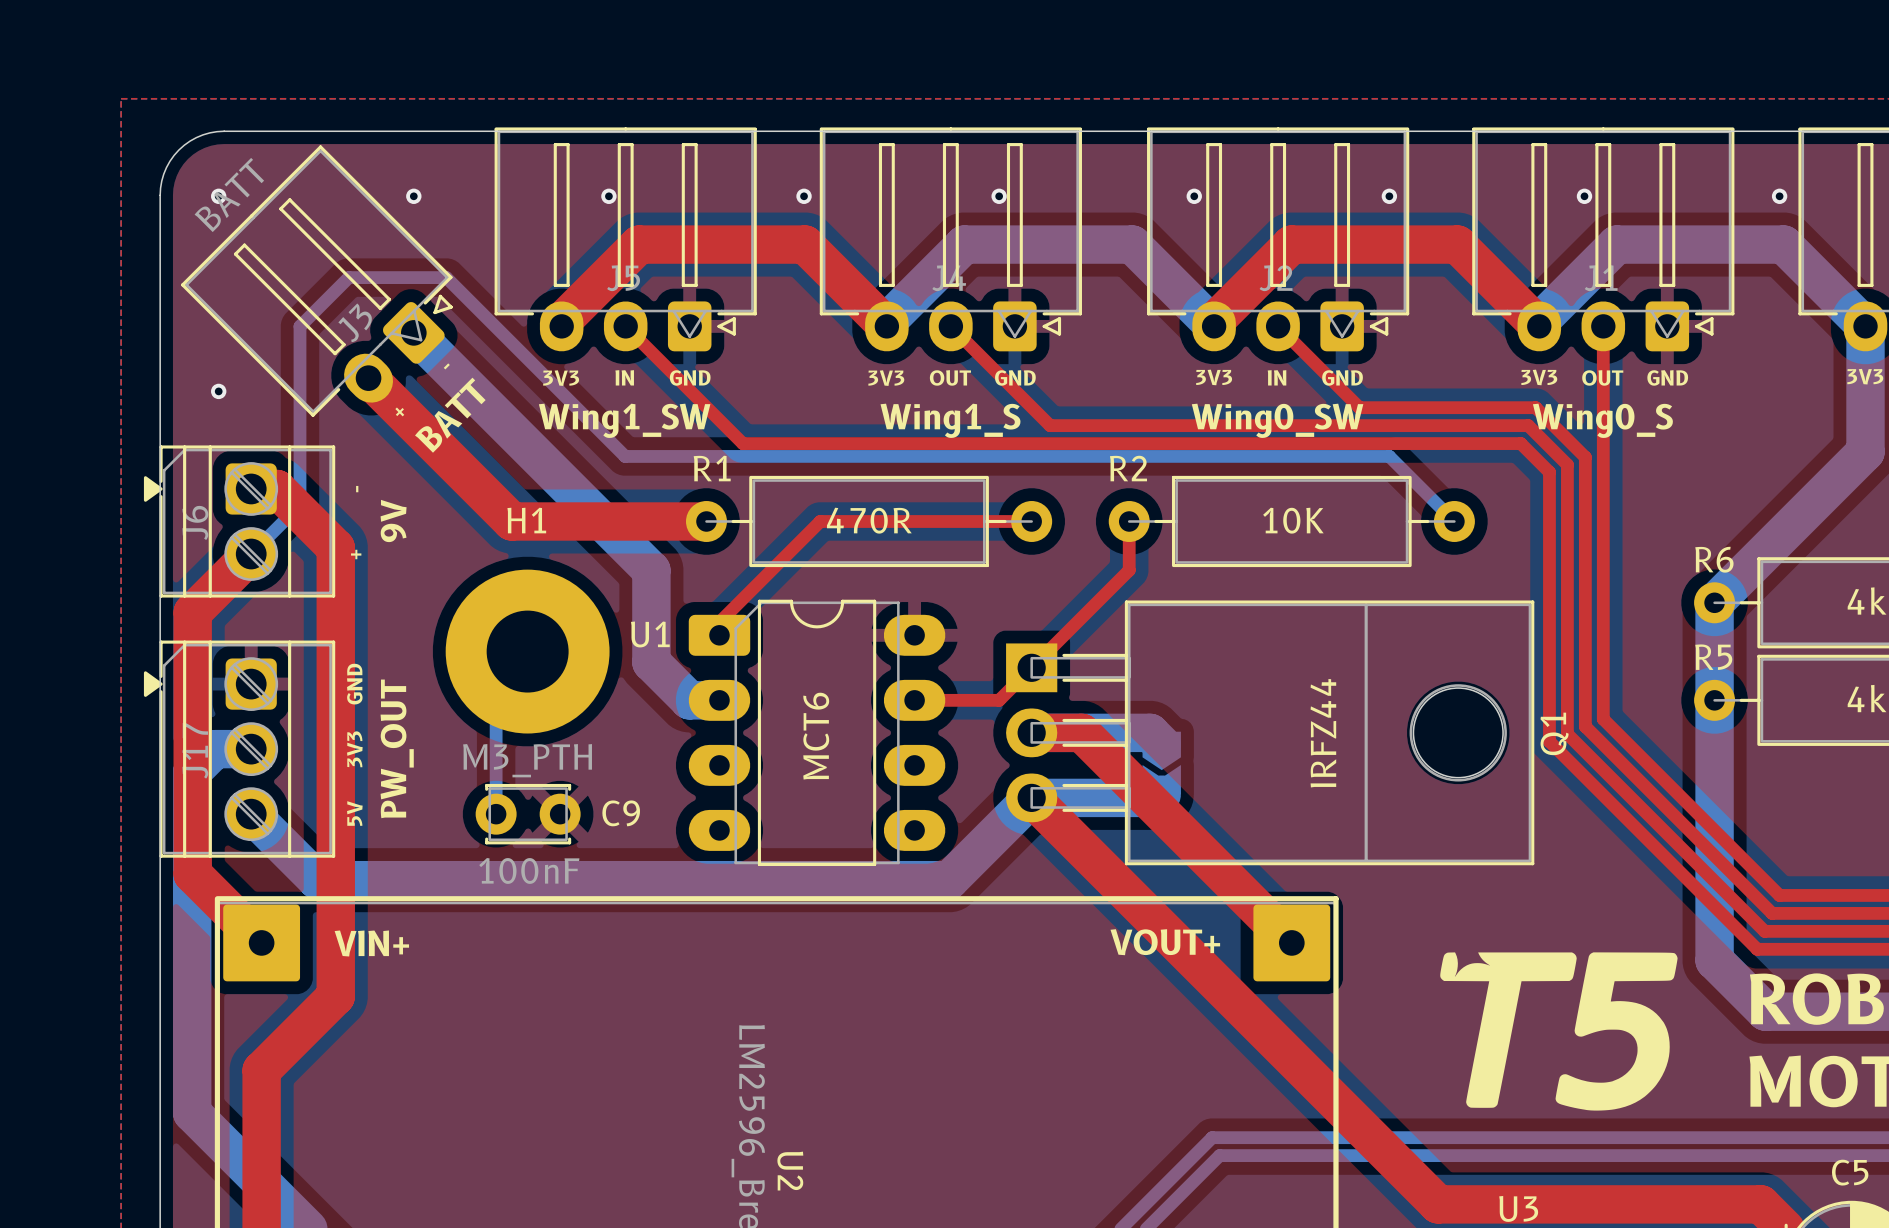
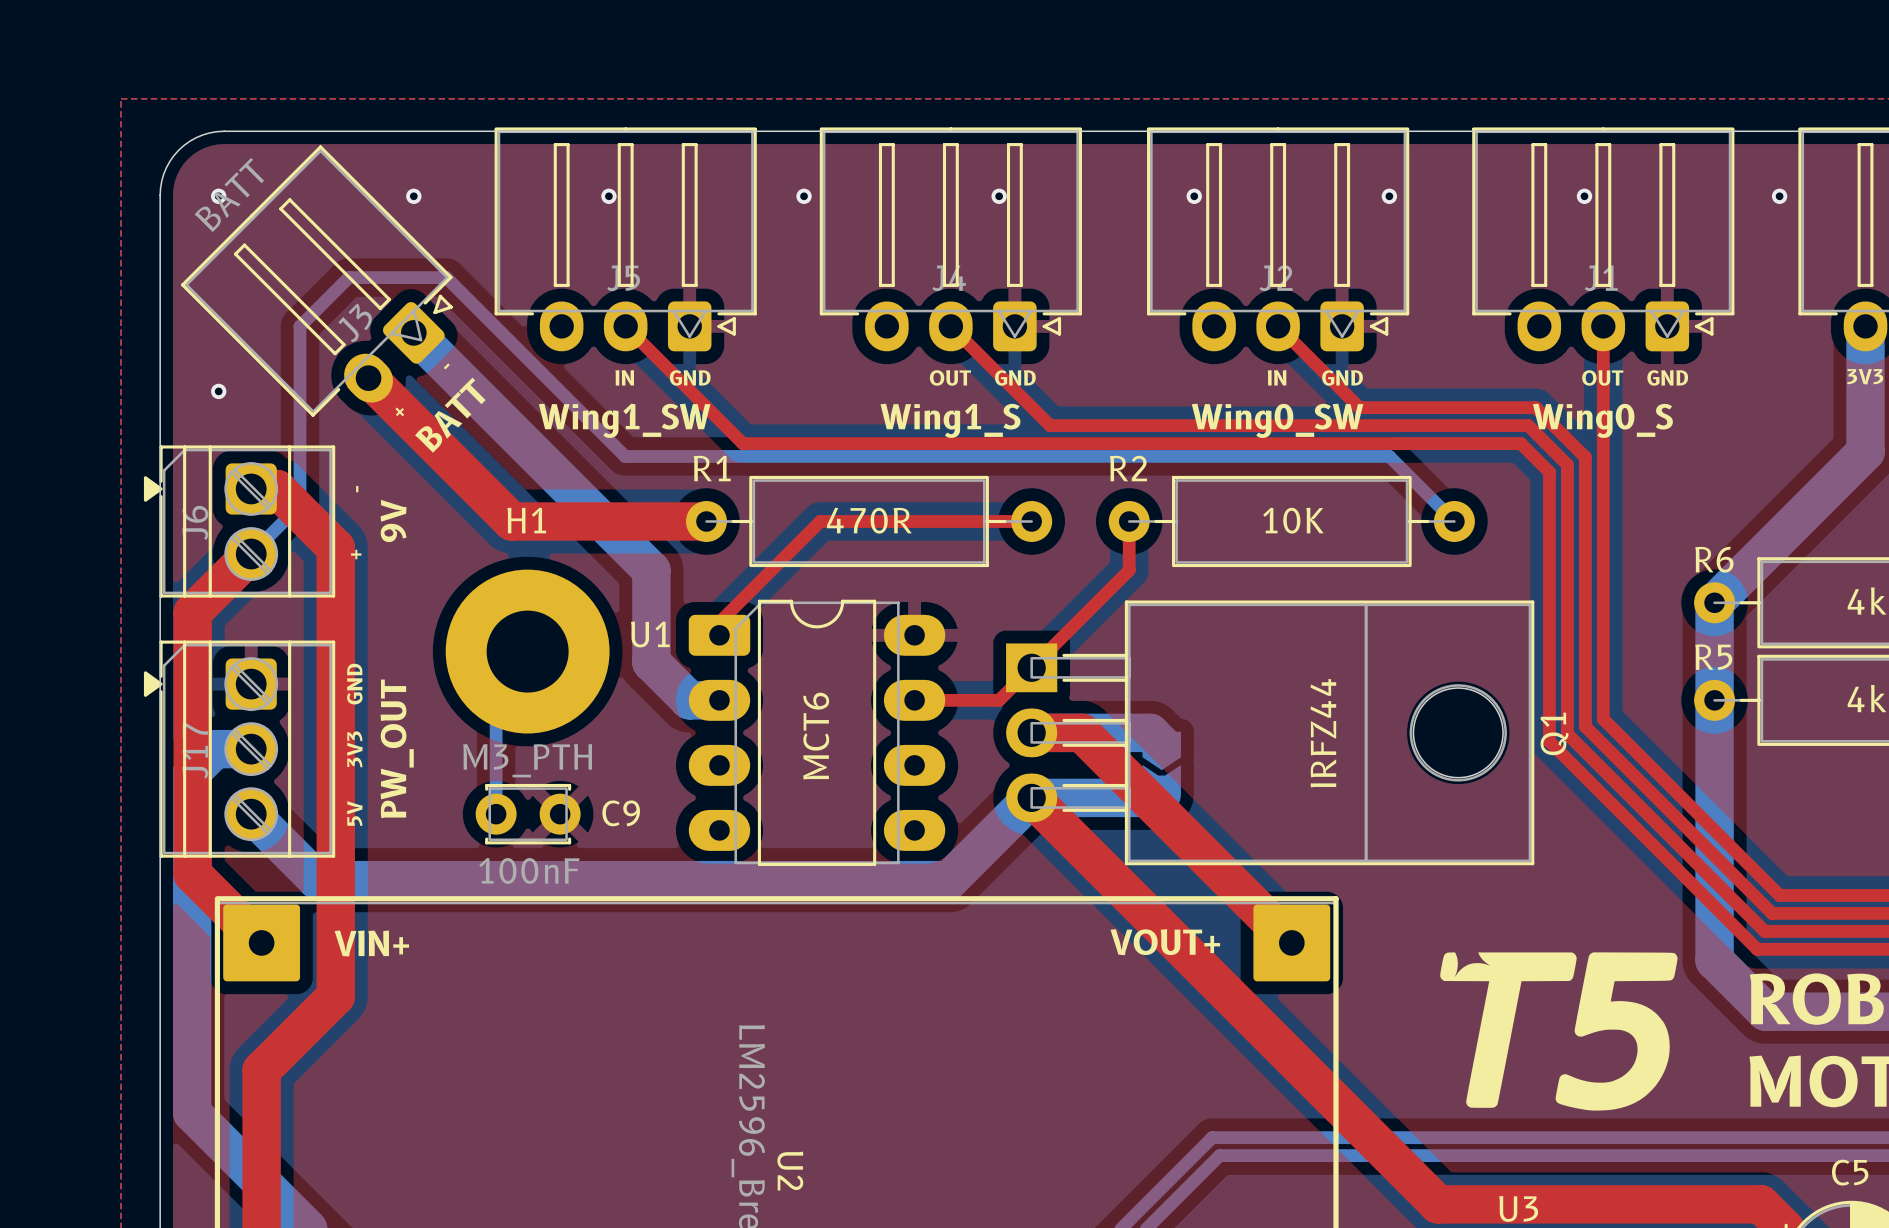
top track: (561, 326) (561, 321) (639, 244) (805, 244) (886, 326) -> none
bottom track: (886, 326) (886, 321) (964, 244) (1132, 244) (1214, 326) -> none
top track: (1214, 326) (1214, 321) (1291, 244) (1457, 244) (1539, 326) -> none
bottom track: (1539, 326) (1539, 321) (1616, 244) (1783, 244) (1865, 326) -> none
text: 3V3 (1214, 377) -> none
text: 3V3 (1539, 377) -> none
text: 3V3 (561, 378) -> none
text: 3V3 (886, 378) -> none

